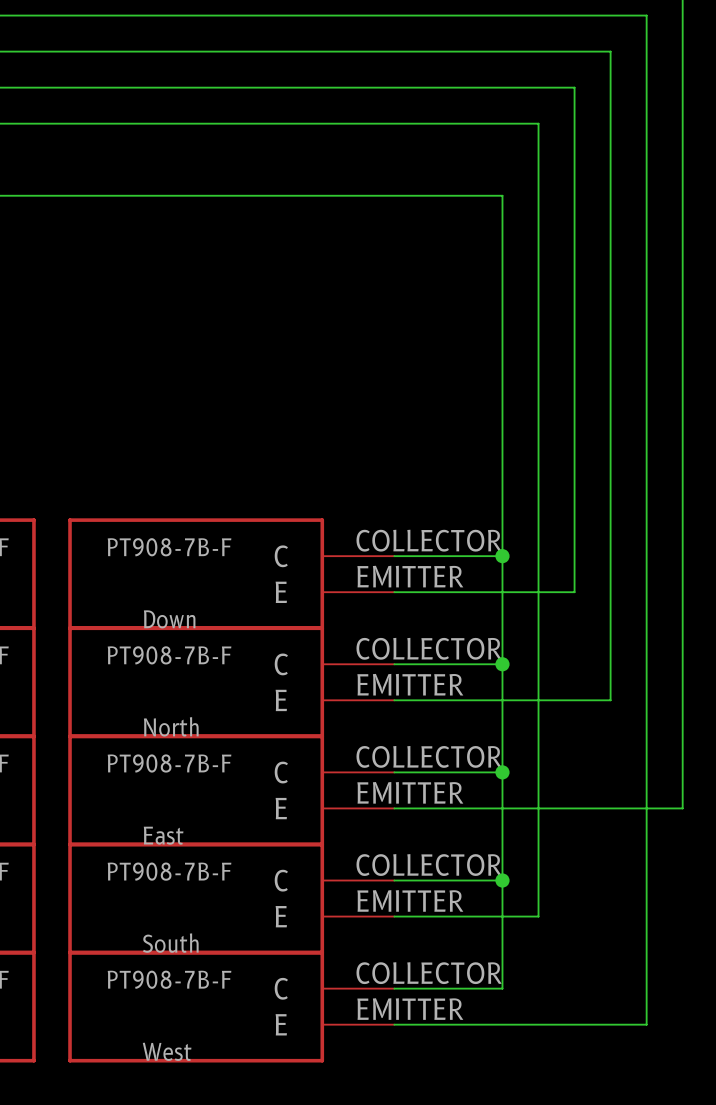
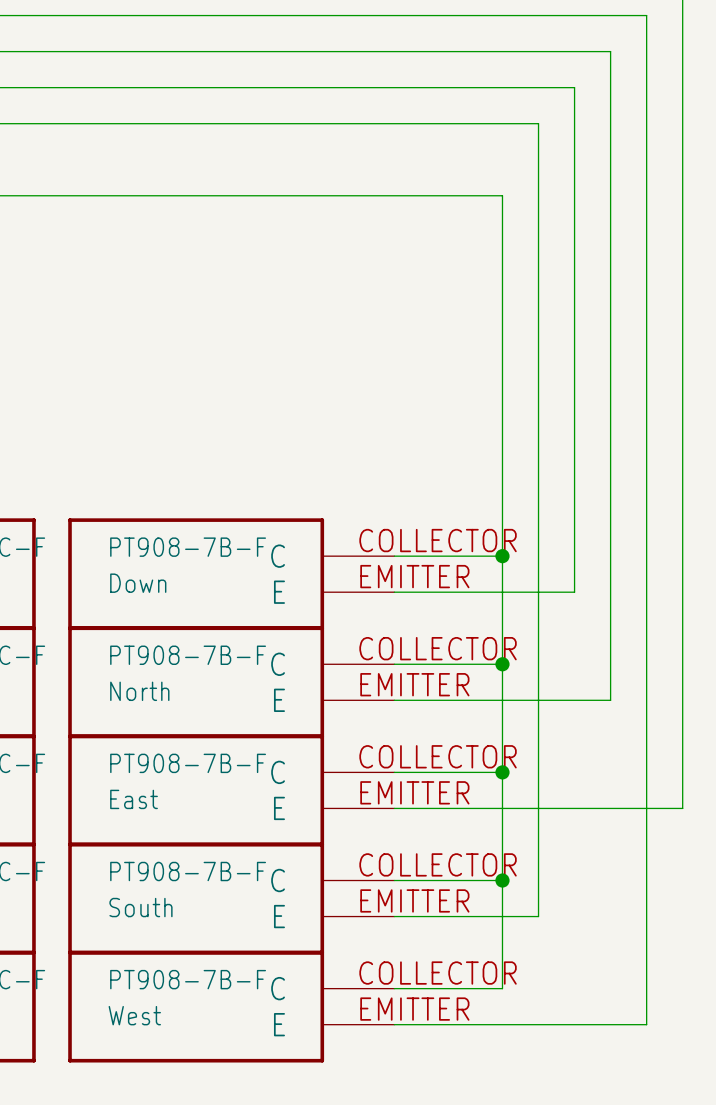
part value position: Down (169, 619) -> Down (138, 583)
part value position: North (171, 726) -> North (139, 691)
part value position: East (163, 835) -> East (134, 799)
part value position: South (170, 943) -> South (140, 907)
part value position: West (167, 1051) -> West (134, 1015)

